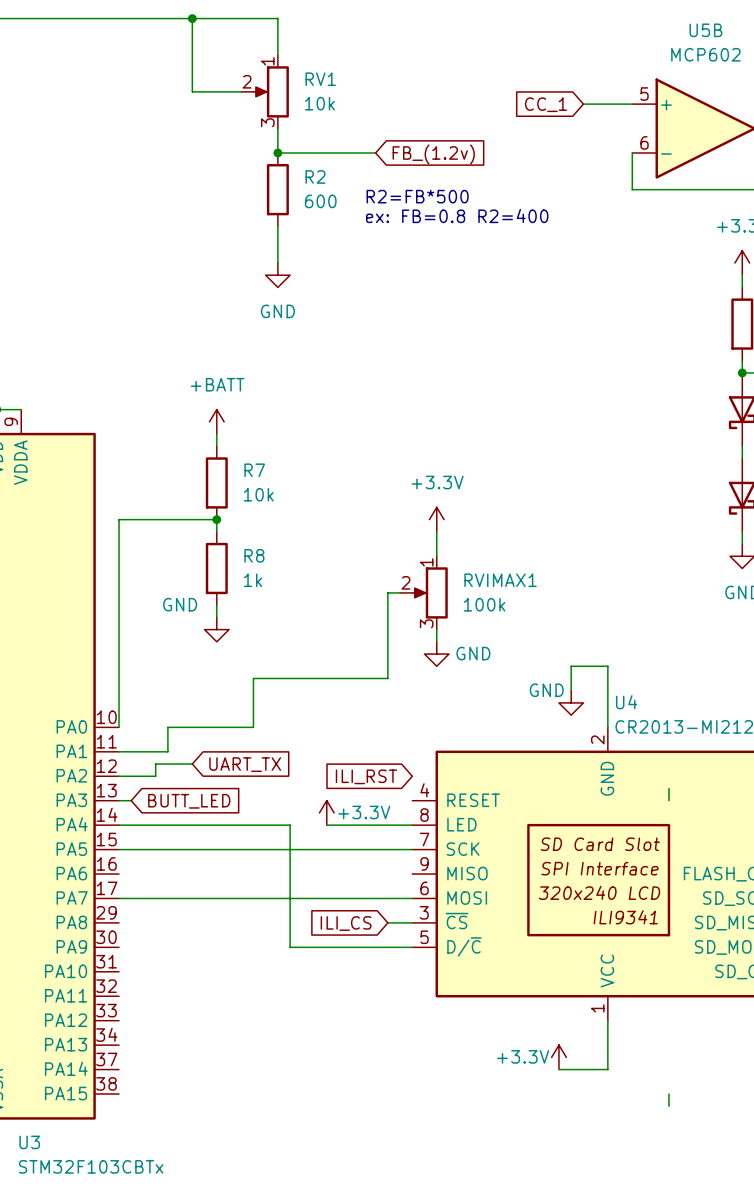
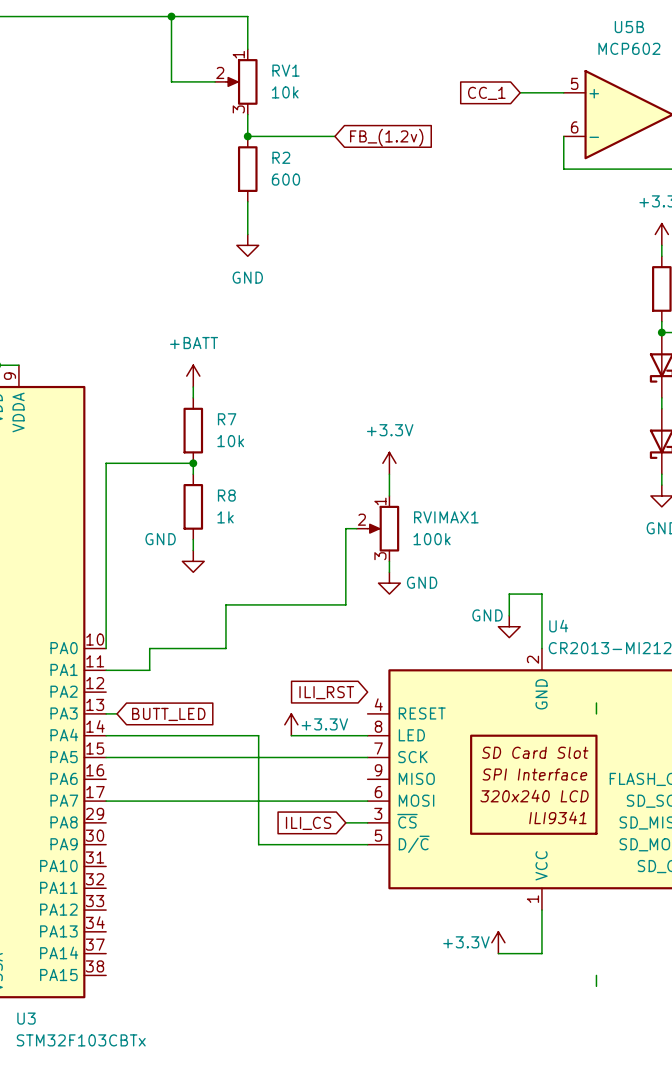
text: R2=FB*500 (417, 196) -> none
text: ex: FB=0.8 R2=400 (457, 216) -> none
wire: (192, 764) (155, 764) (155, 776) (119, 776) -> none
global label: UART_TX (245, 764) -> none

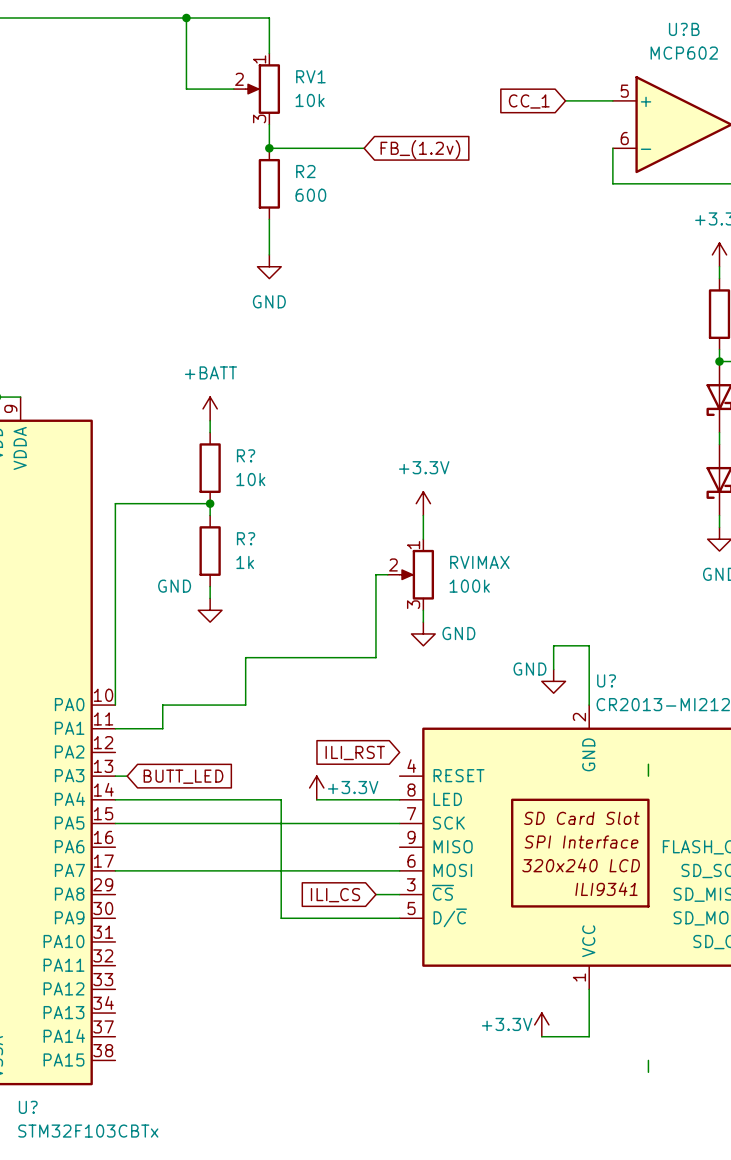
U5B name: U5B (629, 27) -> U?B (684, 29)
R7 name: R7 (227, 419) -> R? (246, 455)
R8 name: R8 (226, 495) -> R? (246, 538)
RVIMAX1 name: RVIMAX1 (446, 517) -> RVIMAX (479, 562)
U4 name: U4 (558, 626) -> U? (606, 680)
U3 name: U3 (26, 1018) -> U? (28, 1107)

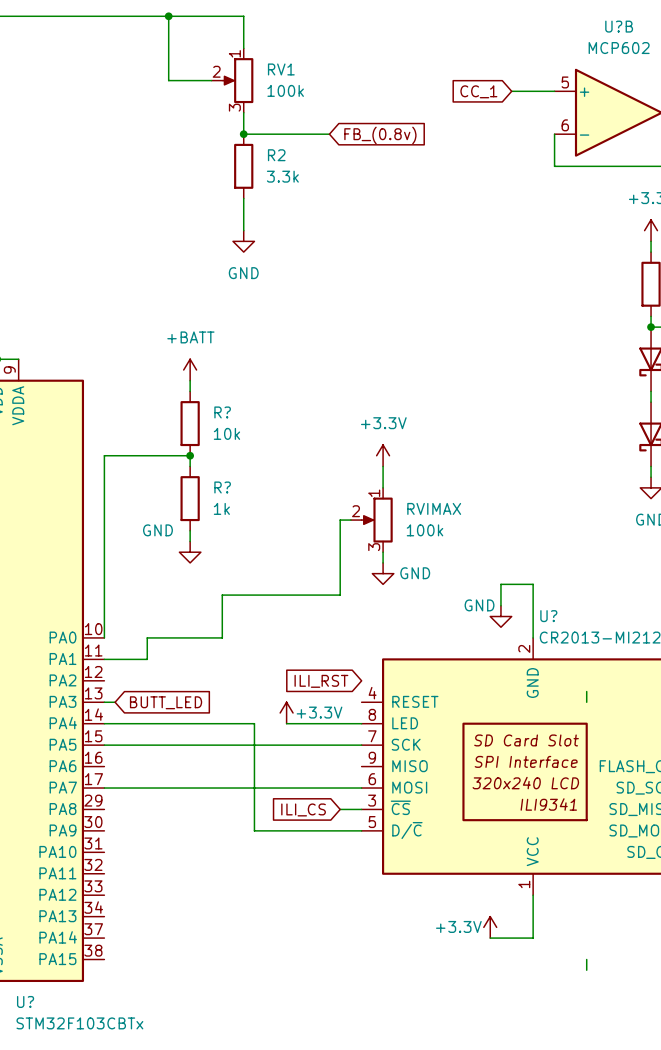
RV1 value: 10k (310, 100) -> 100k (285, 90)
global label: FB_(1.2v) (420, 149) -> FB_(0.8v) (380, 135)
R2 value: 600 (310, 195) -> 3.3k (282, 176)

